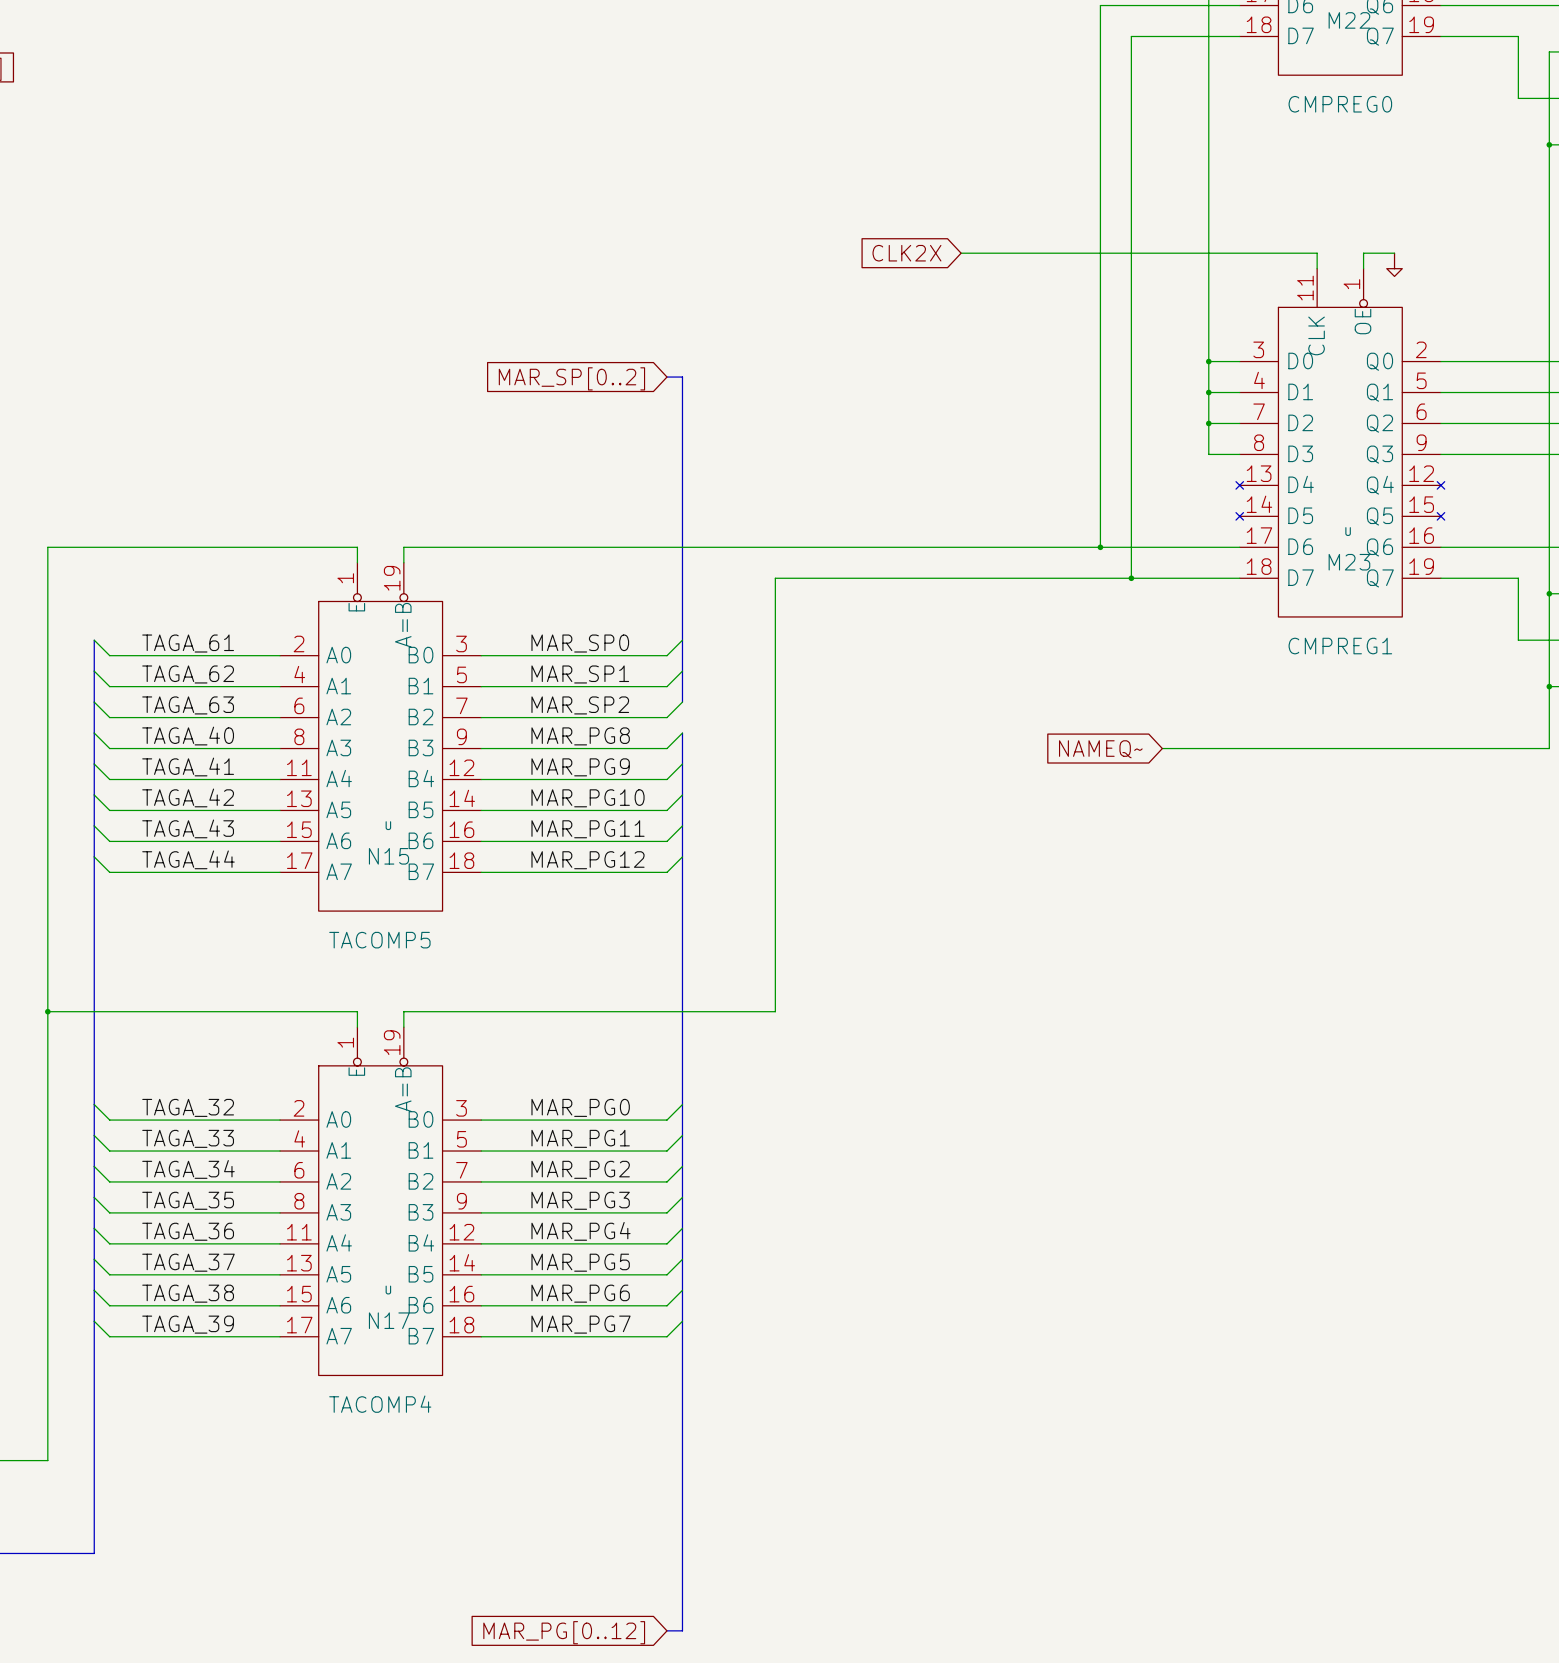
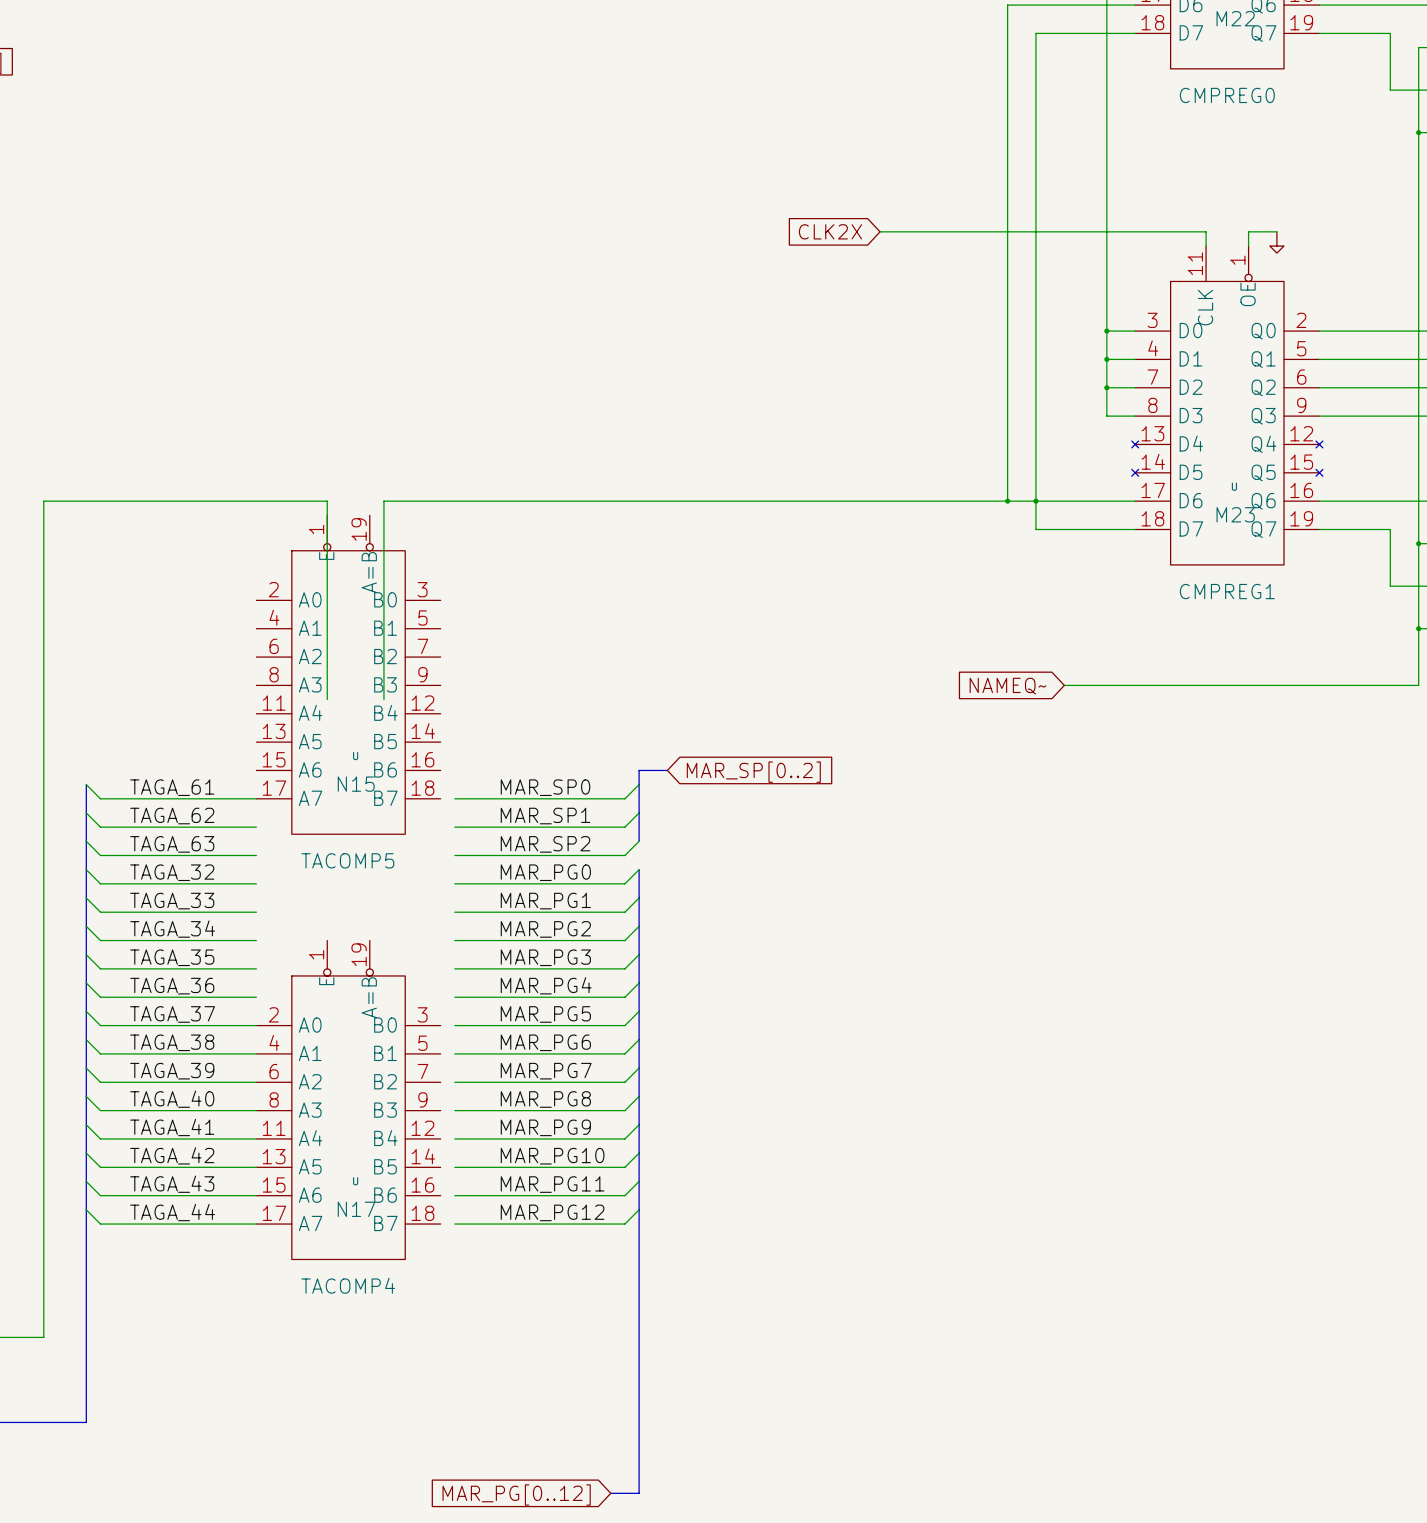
bus: (667, 377) (682, 377) (682, 702) -> none
global label: MAR_SP[0..2] (571, 378) -> none
wire: (419, 547) (403, 547) (403, 562) -> (383, 501) (383, 699)
wire: none -> (327, 515) (327, 699)
wire: (1131, 578) (775, 578) (775, 1011) (403, 1011) (403, 1027) -> none
junction position: (1131, 578) -> (1035, 501)
wire: (94, 640) (109, 655) (280, 655) -> none
bus: (94, 640) (94, 856) -> none
wire: (682, 640) (667, 655) (481, 655) -> none
label: TAGA_61 (188, 643) -> none
label: MAR_SP0 (580, 643) -> none
wire: (94, 671) (109, 686) (280, 686) -> none
wire: (682, 671) (667, 686) (481, 686) -> none
label: TAGA_62 (188, 674) -> none
label: MAR_SP1 (580, 674) -> none
wire: (94, 702) (109, 717) (280, 717) -> none
wire: (682, 702) (667, 717) (481, 717) -> none
label: TAGA_63 (188, 705) -> none
label: MAR_SP2 (580, 705) -> none
wire: (94, 733) (109, 748) (280, 748) -> none
wire: (682, 733) (667, 748) (481, 748) -> none
bus: (682, 733) (682, 1630) -> (639, 869) (639, 1493) (624, 1493)
label: TAGA_40 (188, 736) -> none
label: MAR_PG8 (580, 736) -> none
wire: (94, 764) (109, 779) (280, 779) -> (86, 812) (100, 827) (256, 827)
wire: (682, 764) (667, 779) (481, 779) -> (639, 812) (624, 827) (454, 827)
label: TAGA_41 (188, 766) -> none
label: MAR_PG9 (580, 767) -> none
wire: (94, 794) (109, 810) (280, 810) -> (86, 841) (100, 855) (256, 855)
wire: (682, 794) (667, 810) (481, 810) -> (639, 841) (624, 855) (454, 855)
label: TAGA_42 (188, 797) -> none
label: MAR_PG10 (588, 798) -> none
wire: (94, 825) (109, 841) (280, 841) -> (86, 869) (100, 883) (256, 883)
wire: (682, 825) (667, 841) (481, 841) -> (639, 869) (624, 883) (454, 883)
label: TAGA_43 (188, 828) -> none
label: MAR_PG11 (588, 829) -> none
bus: none -> (667, 770) (639, 770) (639, 841)
global label: none -> MAR_SP[0..2] (753, 772)
wire: (682, 856) (667, 872) -> (639, 784) (624, 798) (610, 798)
label: TAGA_44 (188, 859) -> TAGA_61 (172, 787)
label: MAR_PG12 (588, 860) -> MAR_SP0 (545, 787)
wire: (481, 872) (496, 872) -> none
label: none -> TAGA_62 (172, 816)
label: none -> MAR_SP1 (545, 816)
label: none -> TAGA_63 (172, 844)
label: none -> MAR_SP2 (545, 844)
label: none -> TAGA_32 (172, 872)
label: none -> MAR_PG0 (545, 872)
wire: none -> (86, 898) (100, 912) (256, 912)
wire: none -> (639, 898) (624, 912) (454, 912)
label: none -> TAGA_33 (172, 901)
label: none -> MAR_PG1 (545, 901)
wire: (47, 1011) (357, 1011) (357, 1027) -> none
junction: (47, 1011) -> none
wire: none -> (86, 926) (100, 940) (256, 940)
wire: none -> (639, 926) (624, 940) (454, 940)
label: none -> TAGA_34 (172, 929)
label: none -> MAR_PG2 (545, 929)
wire: none -> (86, 954) (100, 968) (256, 968)
wire: none -> (639, 954) (624, 968) (454, 968)
label: none -> TAGA_35 (172, 957)
label: none -> MAR_PG3 (545, 957)
wire: none -> (86, 983) (100, 997) (256, 997)
wire: none -> (639, 983) (624, 997) (454, 997)
label: none -> TAGA_36 (172, 986)
label: none -> MAR_PG4 (546, 985)
wire: (682, 1104) (667, 1120) -> (639, 1011) (624, 1025) (610, 1025)
label: TAGA_32 (188, 1107) -> TAGA_37 (172, 1014)
label: MAR_PG0 (580, 1107) -> MAR_PG5 (545, 1014)
wire: (481, 1120) (496, 1120) -> none
wire: (682, 1135) (667, 1151) -> (639, 1039) (624, 1053) (610, 1053)
label: TAGA_33 (188, 1138) -> TAGA_38 (172, 1042)
label: MAR_PG1 (580, 1138) -> MAR_PG6 (545, 1042)
wire: (481, 1151) (496, 1151) -> none
wire: (682, 1166) (667, 1181) -> (639, 1068) (624, 1082) (610, 1082)
label: TAGA_34 (188, 1169) -> TAGA_39 (172, 1071)
label: MAR_PG2 (580, 1169) -> MAR_PG7 (546, 1071)
wire: (481, 1181) (496, 1181) -> none
wire: (682, 1197) (667, 1212) -> (639, 1096) (624, 1110) (610, 1110)
label: TAGA_35 (188, 1200) -> TAGA_40 (172, 1099)
label: MAR_PG3 (580, 1200) -> MAR_PG8 (545, 1099)
wire: (481, 1212) (496, 1212) -> none
wire: (682, 1228) (667, 1243) -> (639, 1124) (624, 1138) (610, 1138)
label: TAGA_36 (188, 1231) -> TAGA_41 (172, 1127)
label: MAR_PG4 (581, 1231) -> MAR_PG9 (545, 1127)
wire: (481, 1243) (496, 1243) -> none
wire: (682, 1259) (667, 1274) -> (639, 1153) (624, 1167) (610, 1167)
label: TAGA_37 (188, 1262) -> TAGA_42 (172, 1155)
label: MAR_PG5 (580, 1262) -> MAR_PG10 (552, 1156)
wire: (481, 1274) (496, 1274) -> none
wire: (682, 1290) (667, 1305) -> (639, 1181) (624, 1195) (610, 1195)
label: TAGA_38 (188, 1293) -> TAGA_43 (172, 1184)
label: MAR_PG6 (580, 1293) -> MAR_PG11 (552, 1184)
wire: (481, 1305) (496, 1305) -> none
wire: (682, 1321) (667, 1336) -> (639, 1209) (624, 1224) (610, 1224)
label: TAGA_39 (188, 1324) -> TAGA_44 (172, 1212)
label: MAR_PG7 (581, 1324) -> MAR_PG12 (552, 1212)
wire: (481, 1336) (496, 1336) -> none

